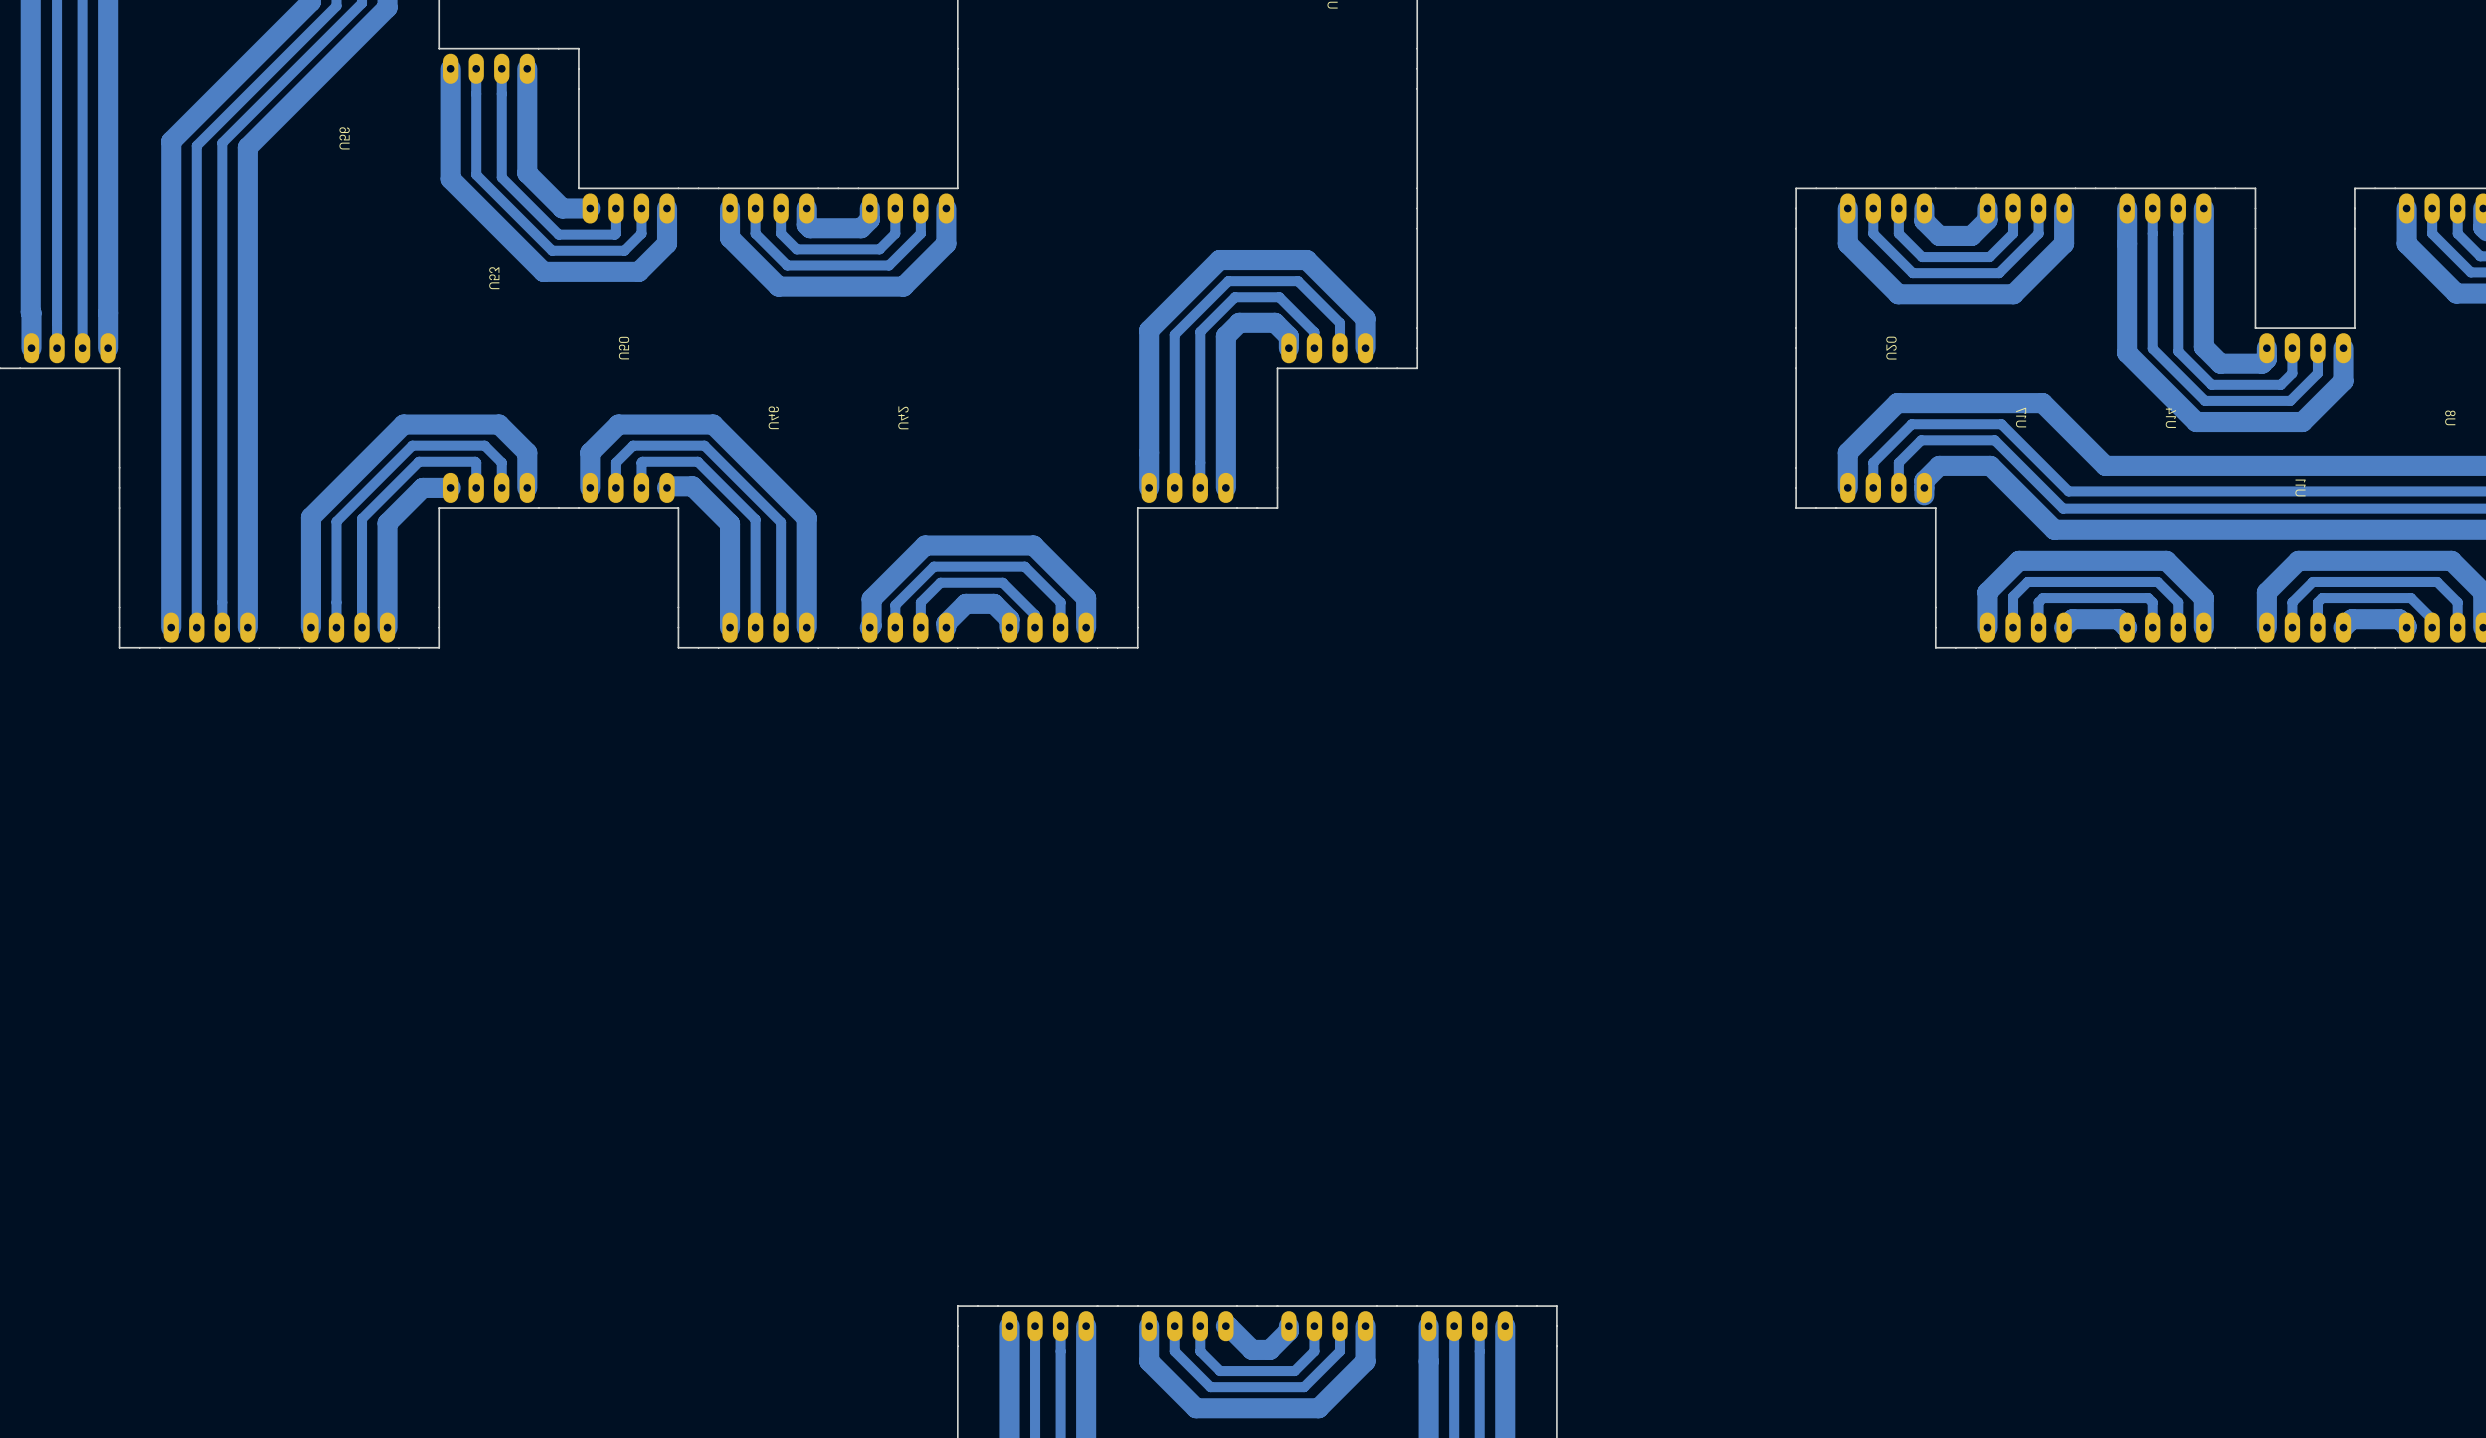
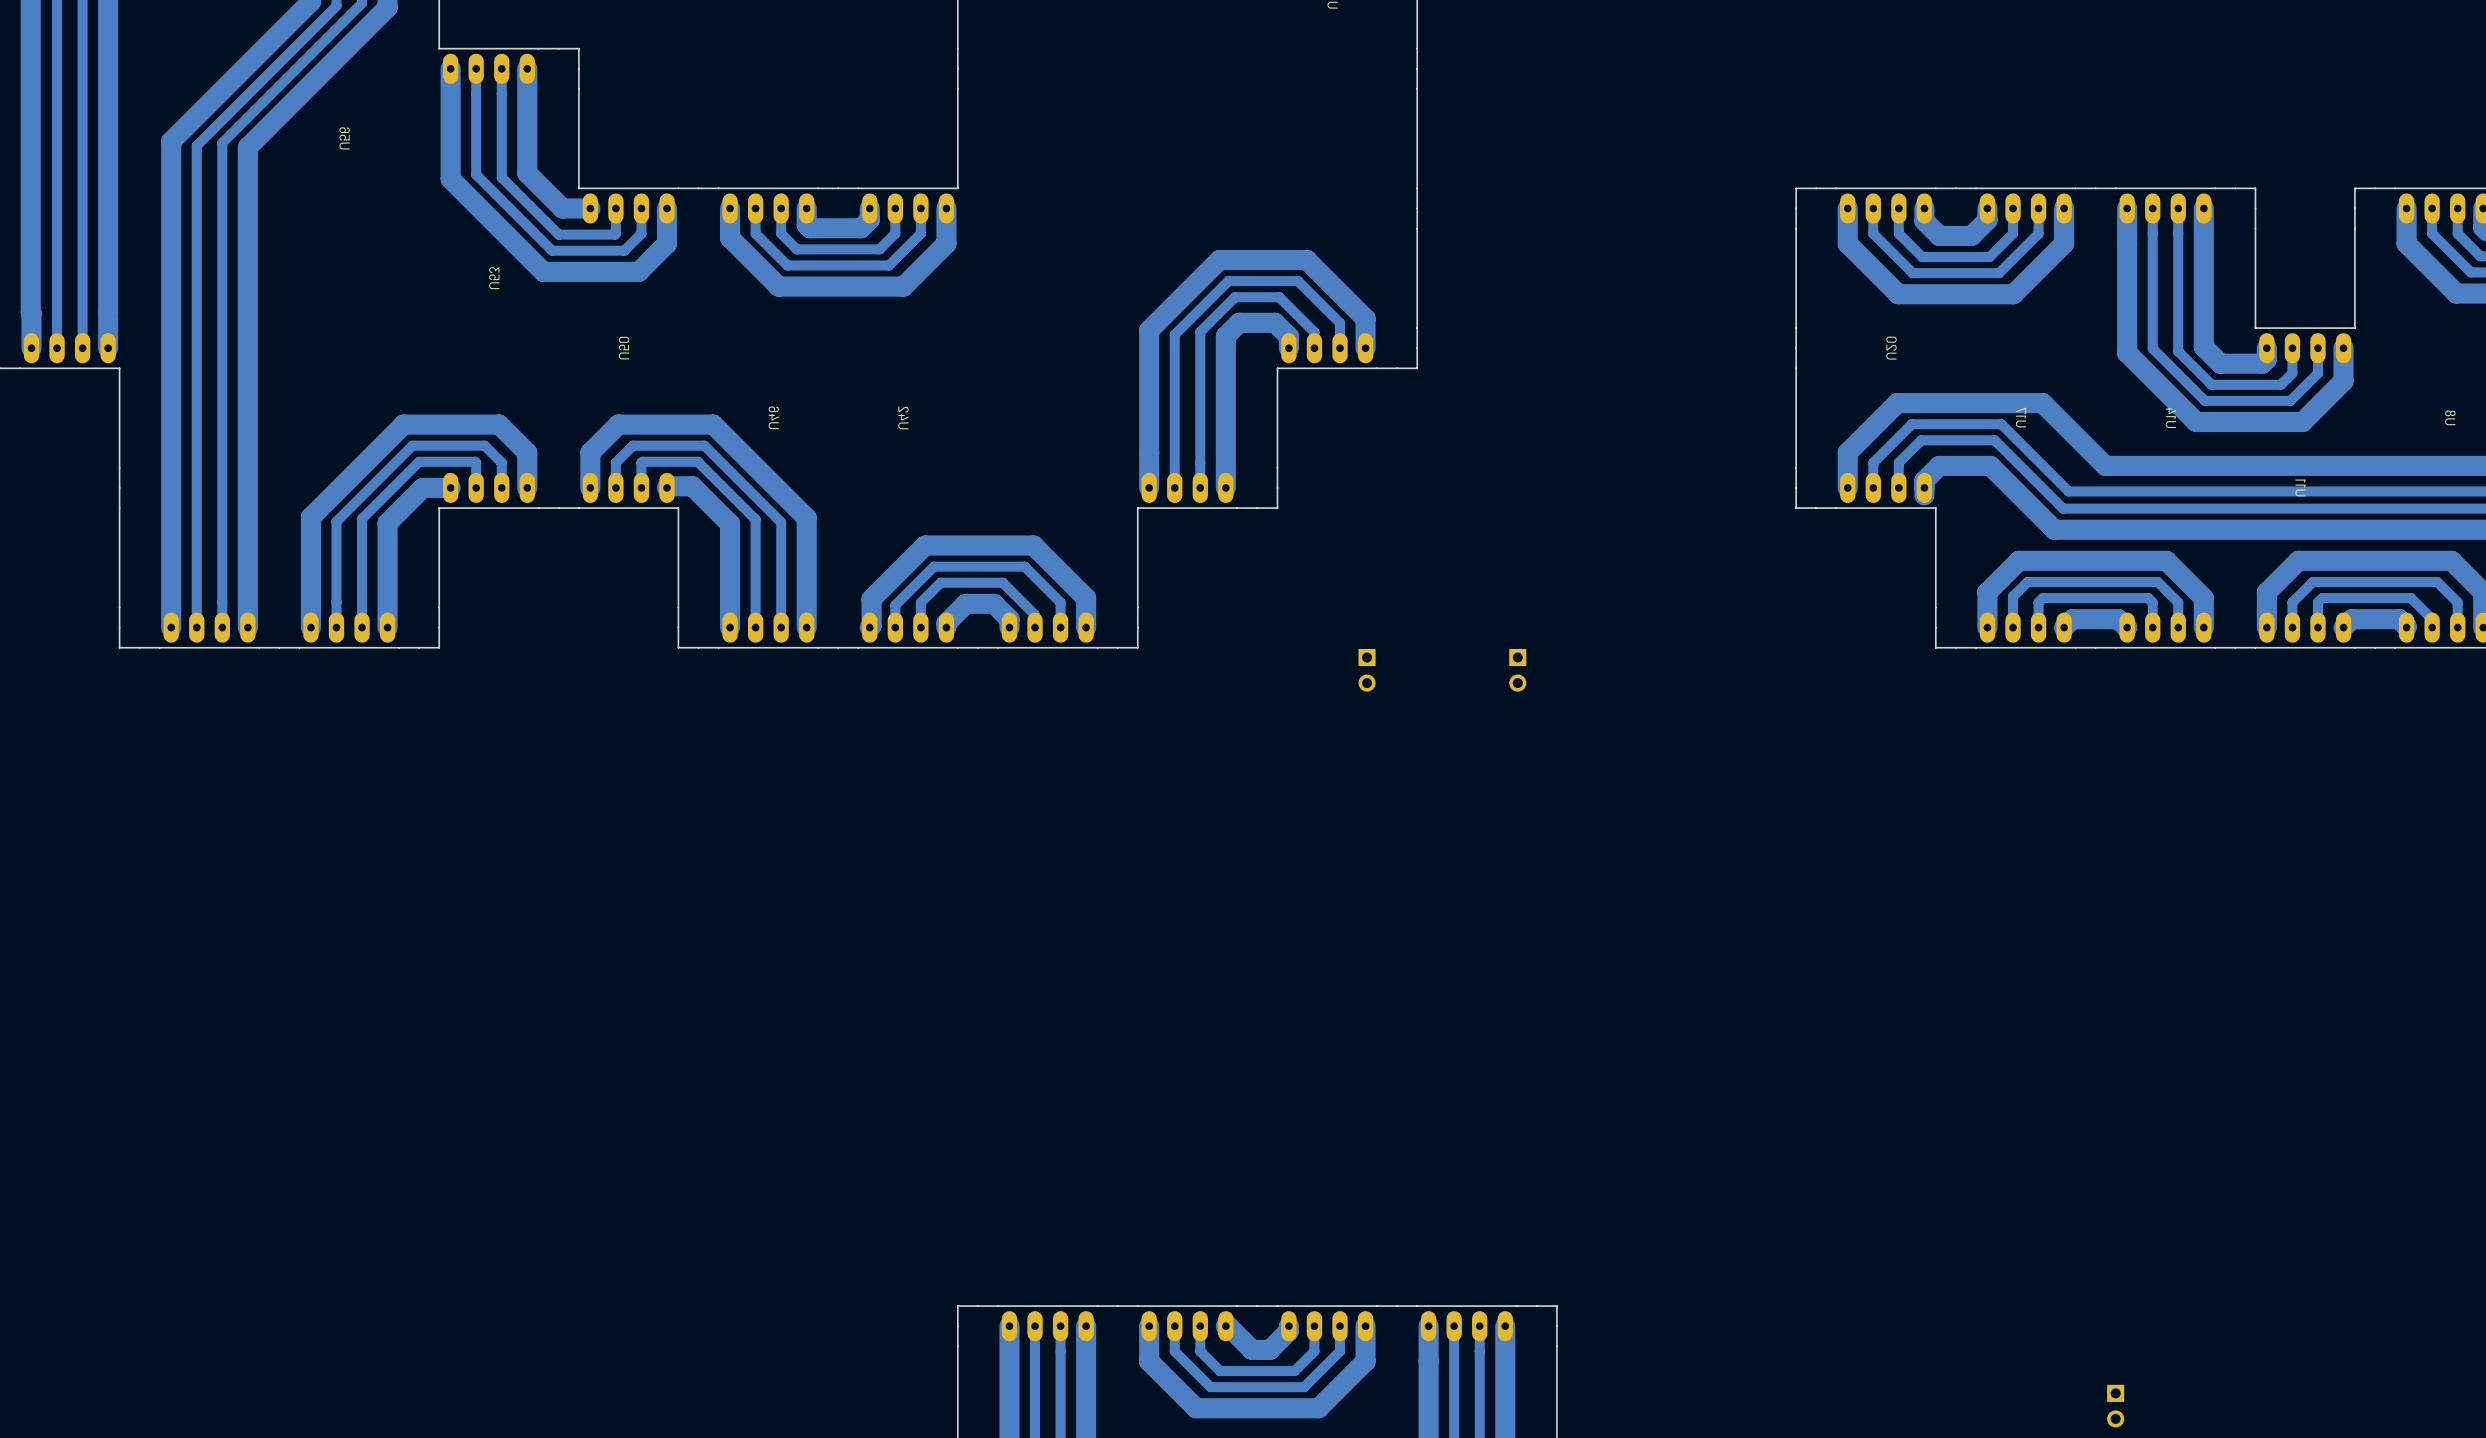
part: none -> (1367, 670)
part: none -> (1517, 670)
part: none -> (2115, 1406)

